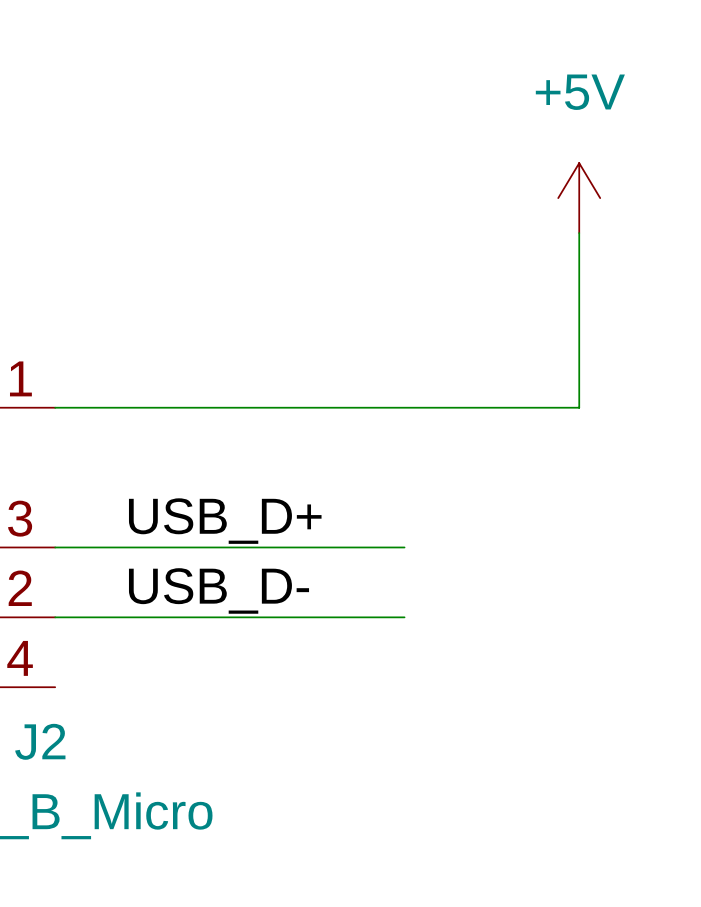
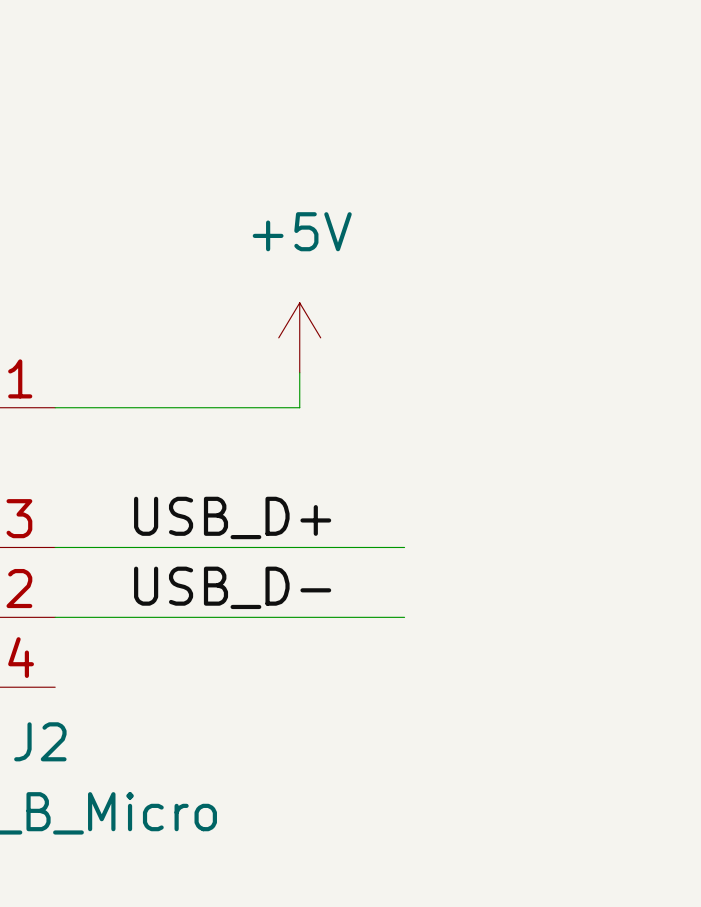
power symbol position: +5V (579, 198) -> +5V (299, 337)
wire: (579, 233) (579, 407) (299, 407) -> (299, 372) (299, 407)

